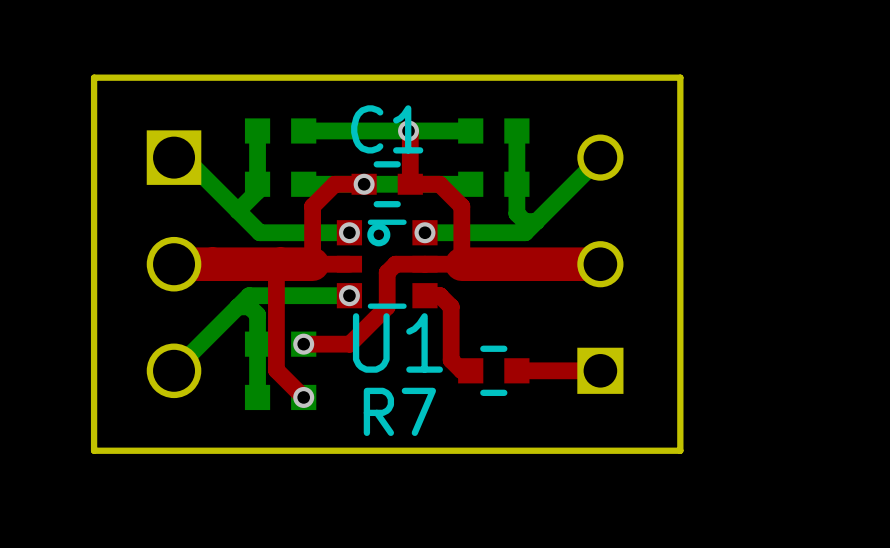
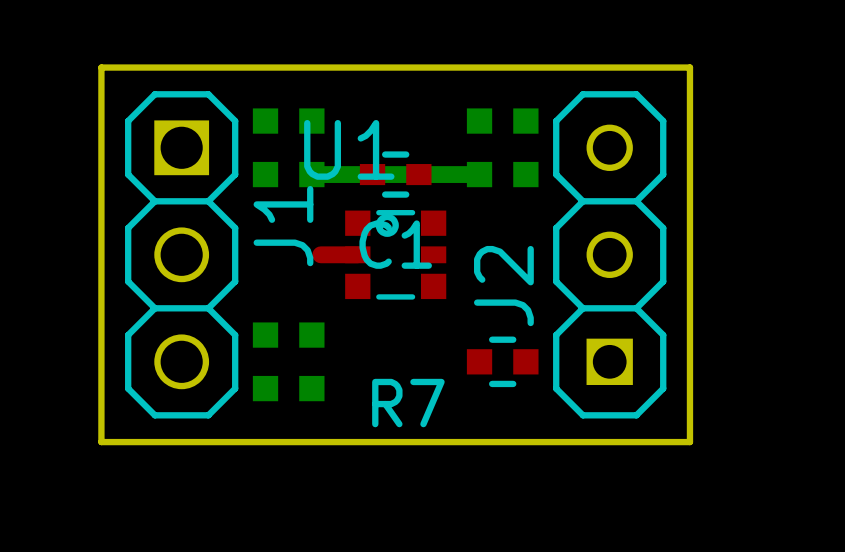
C1 name position: C1 (387, 129) -> C1 (395, 244)
bottom track: (257, 130) (257, 191) (237, 210) -> none
bottom track: (303, 130) (470, 130) -> none
top track: (408, 130) (410, 132) (410, 184) (439, 184) (461, 206) (461, 264) -> none
via: (408, 130) -> none
bottom track: (516, 130) (516, 213) (524, 221) (536, 221) -> none
bottom track: (174, 157) (184, 157) (259, 232) (349, 232) -> none
bottom track: (600, 157) (525, 232) (424, 232) -> none
top track: (364, 184) (334, 184) (312, 206) (312, 264) (174, 264) -> none
via: (364, 184) -> none
via: (349, 232) -> none
via: (424, 232) -> none
J1 side: bottom (174, 264) -> top (181, 254)
top track: (280, 264) (276, 268) (276, 370) (303, 397) -> none
top track: (461, 264) (395, 264) (387, 272) (387, 306) (349, 344) (303, 344) -> none
top track: (461, 264) (600, 264) -> none
J2 side: bottom (600, 264) -> top (609, 254)
bottom track: (349, 295) (249, 295) (174, 370) -> none
via: (349, 295) -> none
top track: (424, 295) (440, 295) (451, 306) (451, 360) (461, 370) (470, 370) -> none
bottom track: (237, 306) (249, 306) (257, 314) (257, 397) -> none
U1 name position: U1 (397, 342) -> U1 (349, 149)
via: (303, 344) -> none
top track: (516, 370) (600, 370) -> none
via: (303, 397) -> none

